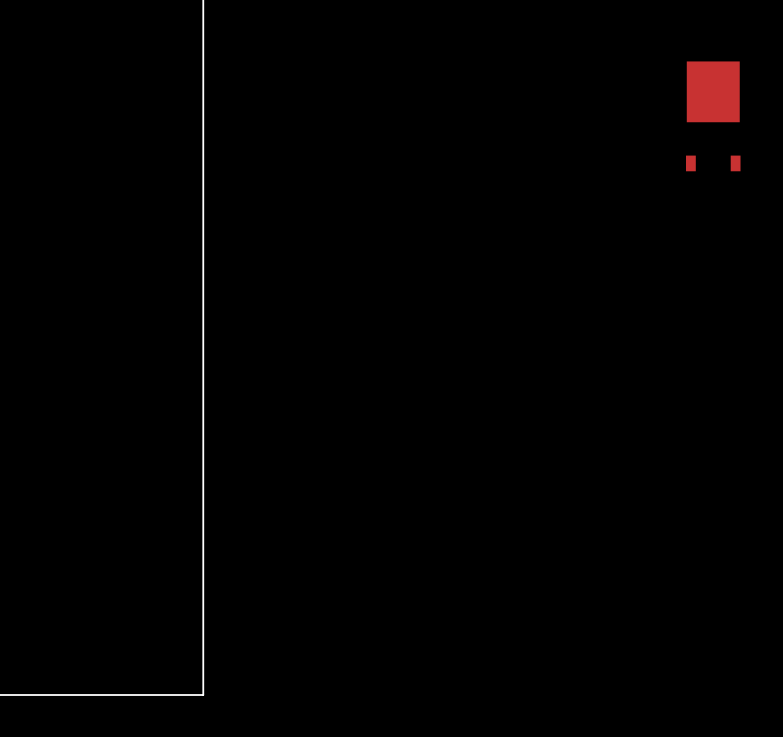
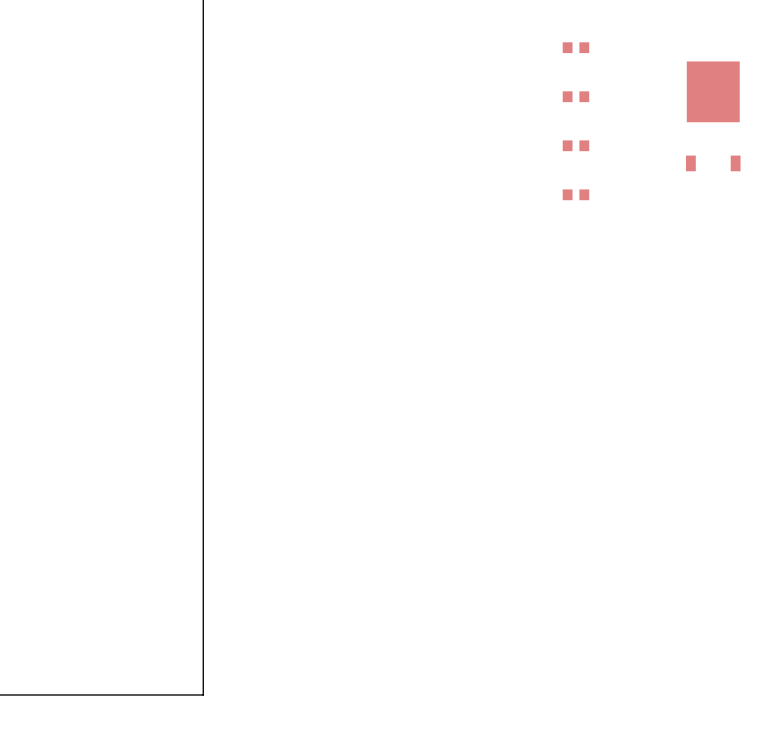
part: none -> (575, 47)
part: none -> (575, 96)
part: none -> (575, 145)
part: none -> (575, 194)

